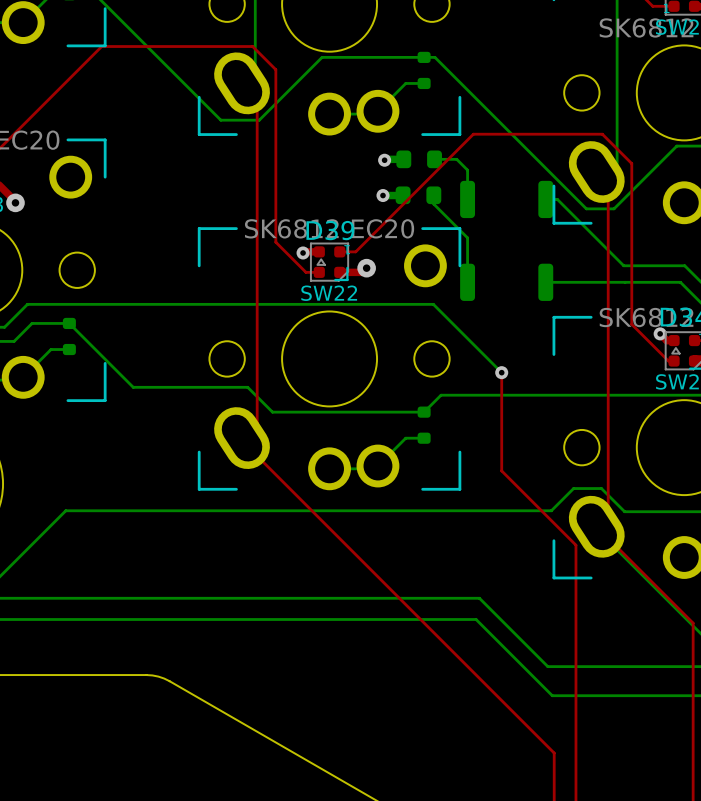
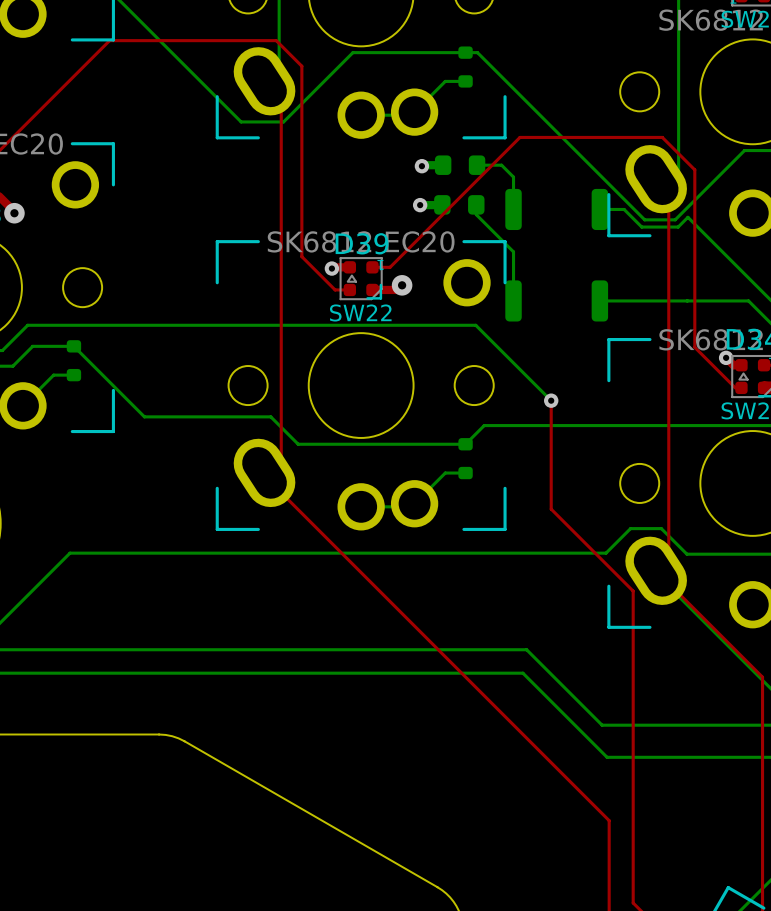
bottom track: (557, 199) (623, 265) (684, 265) -> (612, 209) (624, 209) (641, 227) (678, 227) (687, 217) (753, 282)

